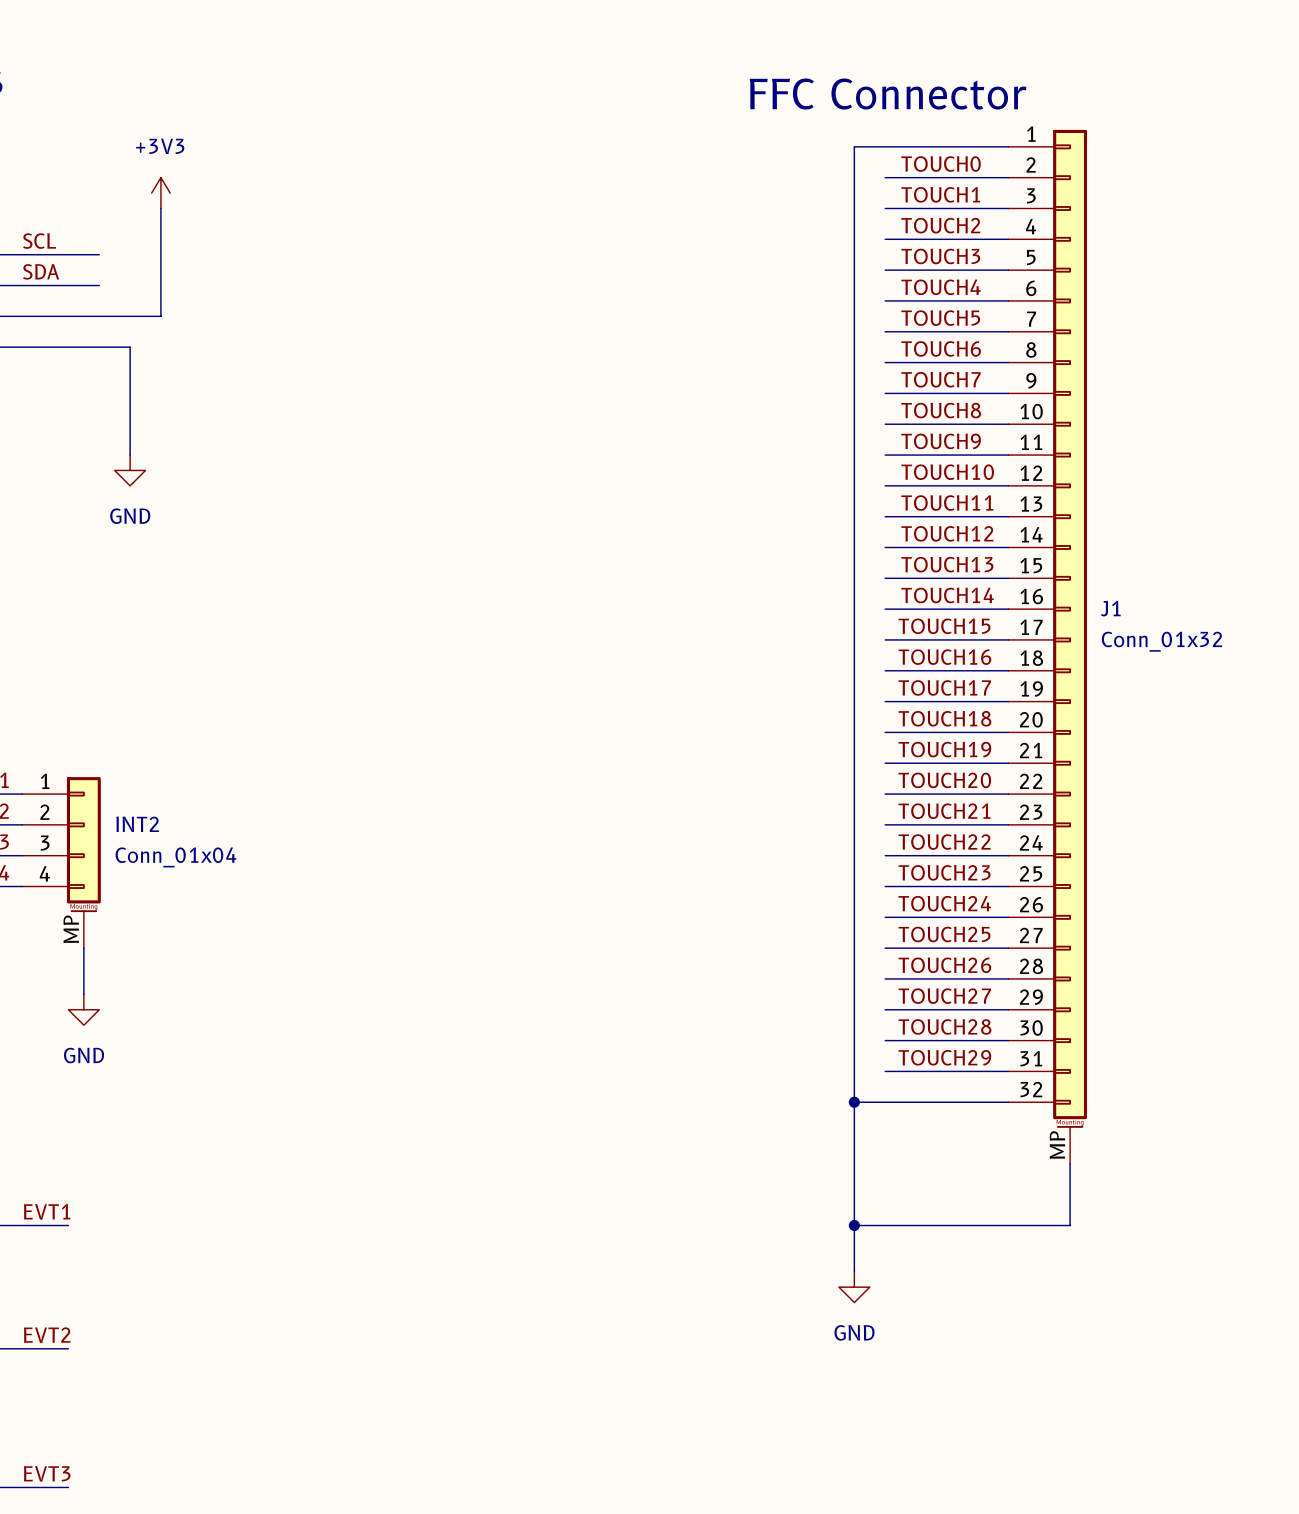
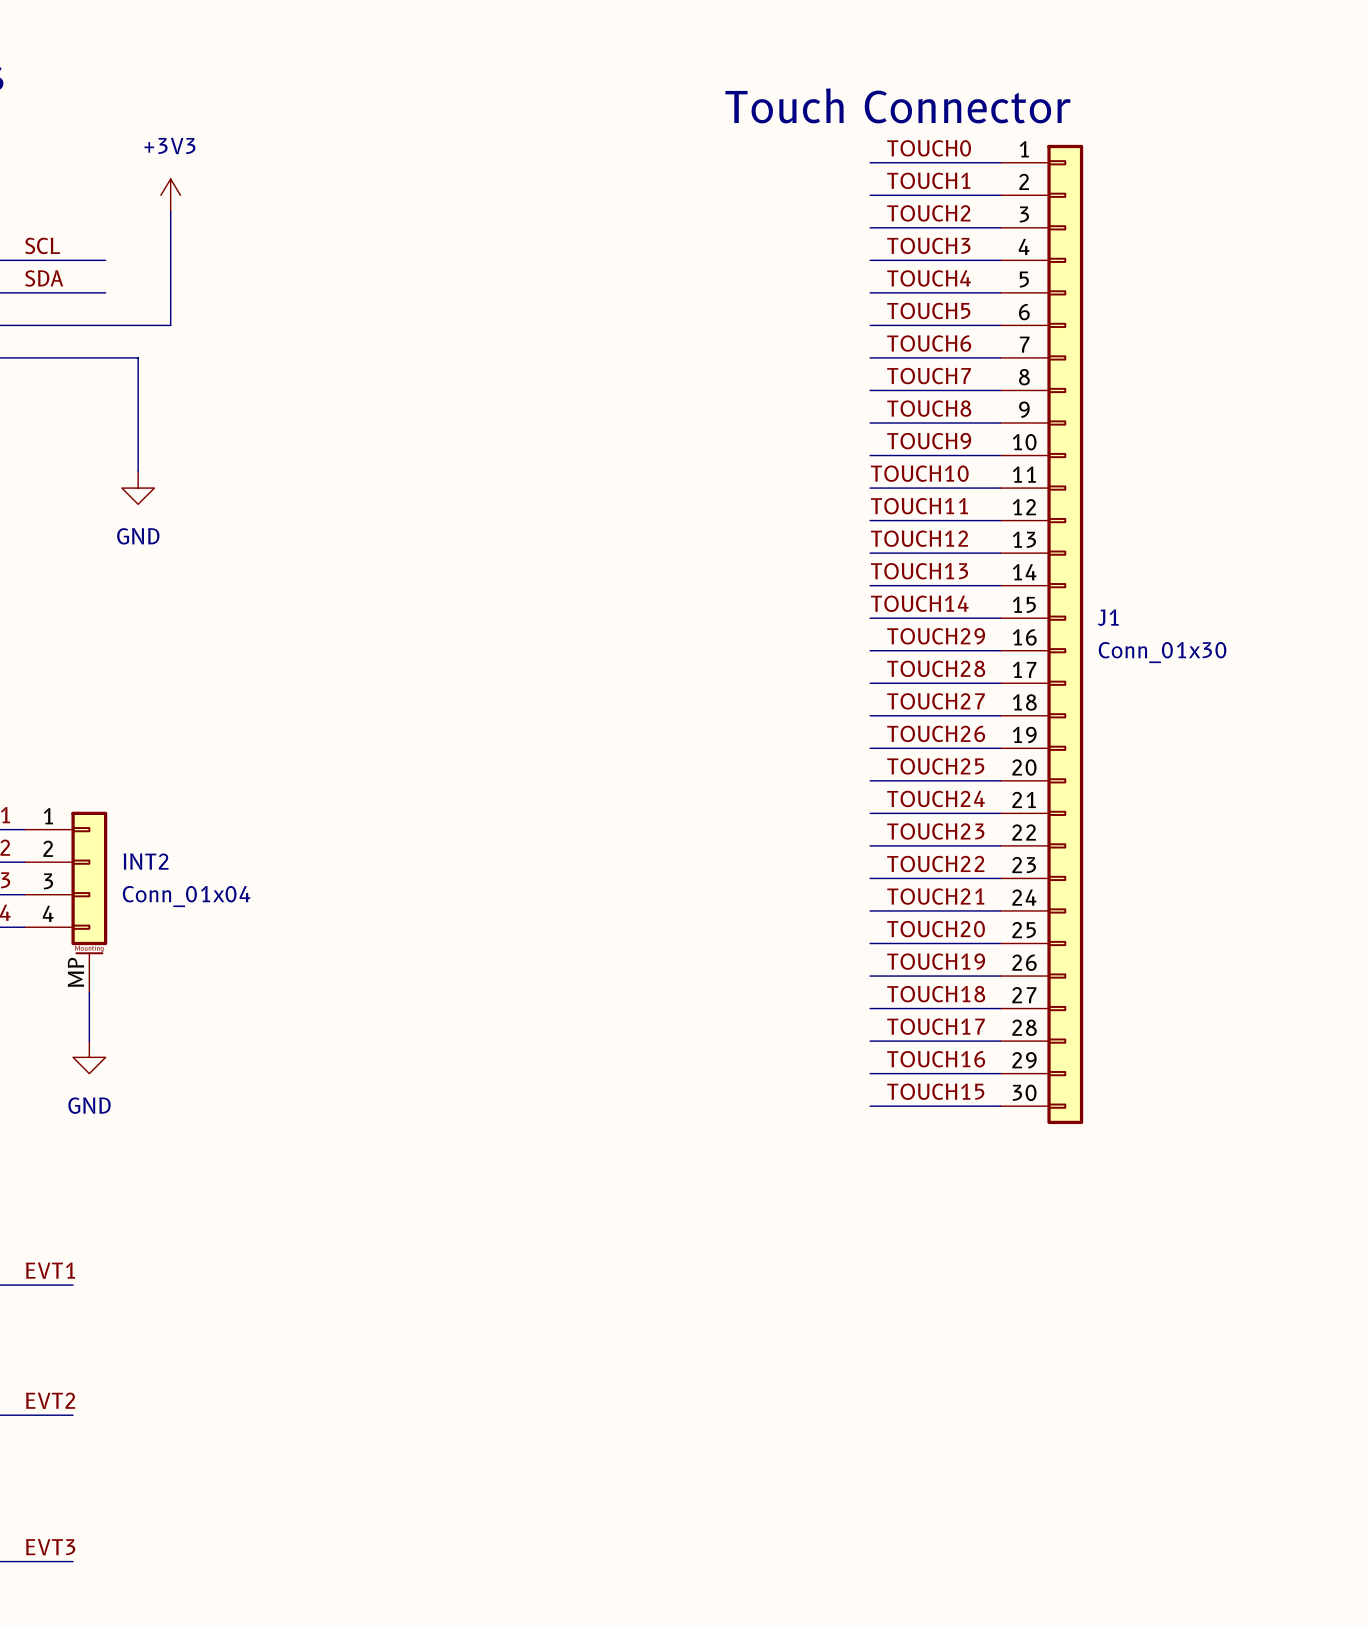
text: FFC Connector (888, 94) -> Touch Connector (897, 105)
J1 symbol: [1008, 129, 1088, 1164] -> [1000, 144, 1084, 1125]
wire: (1008, 146) (854, 146) (854, 1271) -> none
label position: TOUCH0 (941, 164) -> TOUCH0 (929, 148)
wire: (885, 177) (1008, 177) -> (870, 162) (1000, 162)
label position: TOUCH1 (940, 194) -> TOUCH1 (928, 180)
wire: (885, 208) (1008, 208) -> (870, 195) (1000, 195)
label position: TOUCH2 (940, 225) -> TOUCH2 (928, 213)
wire: (885, 239) (1008, 239) -> (870, 227) (1000, 227)
label position: TOUCH3 (940, 256) -> TOUCH3 (928, 245)
wire: (885, 270) (1008, 270) -> (870, 260) (1000, 260)
label position: TOUCH4 (941, 287) -> TOUCH4 (929, 278)
wire: (885, 300) (1008, 300) -> (870, 292) (1000, 292)
label position: TOUCH5 (940, 318) -> TOUCH5 (928, 310)
wire: (885, 331) (1008, 331) -> (870, 325) (1000, 325)
label position: TOUCH6 (941, 348) -> TOUCH6 (929, 343)
wire: (885, 362) (1008, 362) -> (870, 357) (1000, 357)
label position: TOUCH7 (941, 379) -> TOUCH7 (929, 376)
wire: (885, 393) (1008, 393) -> (870, 390) (1000, 390)
label position: TOUCH8 (941, 410) -> TOUCH8 (929, 408)
wire: (885, 424) (1008, 424) -> (870, 423) (1000, 423)
label position: TOUCH9 (941, 441) -> TOUCH9 (929, 441)
wire: (885, 455) (1008, 455) -> (870, 455) (1000, 455)
label position: TOUCH10 (947, 472) -> TOUCH10 (919, 473)
wire: (885, 485) (1008, 485) -> (870, 488) (1000, 488)
label position: TOUCH11 (947, 503) -> TOUCH11 (919, 506)
wire: (885, 516) (1008, 516) -> (870, 520) (1000, 520)
label position: TOUCH12 (947, 533) -> TOUCH12 (919, 538)
wire: (885, 547) (1008, 547) -> (870, 553) (1000, 553)
label position: TOUCH13 (947, 564) -> TOUCH13 (919, 571)
wire: (885, 578) (1008, 578) -> (870, 585) (1000, 585)
label position: TOUCH14 (947, 595) -> TOUCH14 (919, 603)
wire: (885, 609) (1008, 609) -> (870, 618) (1000, 618)
label: none -> TOUCH29 (936, 636)
label: TOUCH15 (944, 626) -> none
wire: (885, 639) (1008, 639) -> (870, 650) (1000, 650)
label: none -> TOUCH28 (936, 668)
J1 value: Conn_01x32 (1161, 641) -> Conn_01x30 (1162, 652)
label: TOUCH16 (944, 657) -> none
wire: (885, 670) (1008, 670) -> (870, 683) (1000, 683)
label: none -> TOUCH27 (936, 701)
label: TOUCH17 (944, 687) -> none
wire: (885, 701) (1008, 701) -> (870, 715) (1000, 715)
label: none -> TOUCH26 (936, 733)
label position: TOUCH18 (944, 718) -> TOUCH18 (936, 994)
wire: (885, 732) (1008, 732) -> (870, 748) (1000, 748)
label position: TOUCH19 (944, 749) -> TOUCH19 (936, 961)
wire: (885, 763) (1008, 763) -> (870, 780) (1000, 780)
label position: TOUCH20 (944, 780) -> TOUCH20 (936, 929)
wire: (885, 794) (1008, 794) -> (870, 813) (1000, 813)
label position: TOUCH21 (944, 811) -> TOUCH21 (935, 896)
wire: (885, 824) (1008, 824) -> (870, 845) (1000, 845)
label position: TOUCH22 (944, 842) -> TOUCH22 (935, 864)
wire: (885, 855) (1008, 855) -> (870, 878) (1000, 878)
label position: TOUCH23 (944, 872) -> TOUCH23 (935, 831)
wire: (885, 886) (1008, 886) -> (870, 910) (1000, 910)
label position: TOUCH24 (944, 903) -> TOUCH24 (936, 798)
wire: (885, 917) (1008, 917) -> (870, 943) (1000, 943)
label position: TOUCH25 (944, 934) -> TOUCH25 (935, 766)
wire: (885, 948) (1008, 948) -> (870, 976) (1000, 976)
label: TOUCH26 (944, 965) -> none
wire: (885, 978) (1008, 978) -> (870, 1008) (1000, 1008)
label: none -> TOUCH17 (936, 1026)
label: TOUCH27 (944, 996) -> none
wire: (885, 1009) (1008, 1009) -> (870, 1041) (1000, 1041)
label: none -> TOUCH16 (936, 1059)
label: TOUCH28 (944, 1026) -> none
wire: (885, 1040) (1008, 1040) -> (870, 1073) (1000, 1073)
label: none -> TOUCH15 (935, 1091)
label: TOUCH29 (944, 1057) -> none
wire: (885, 1071) (1008, 1071) -> (870, 1106) (1000, 1106)
wire: (854, 1102) (1008, 1102) -> none
junction: (854, 1102) -> none
wire: (1070, 1163) (1070, 1225) (854, 1225) -> none
junction: (854, 1225) -> none
power symbol: GND (854, 1287) -> none

